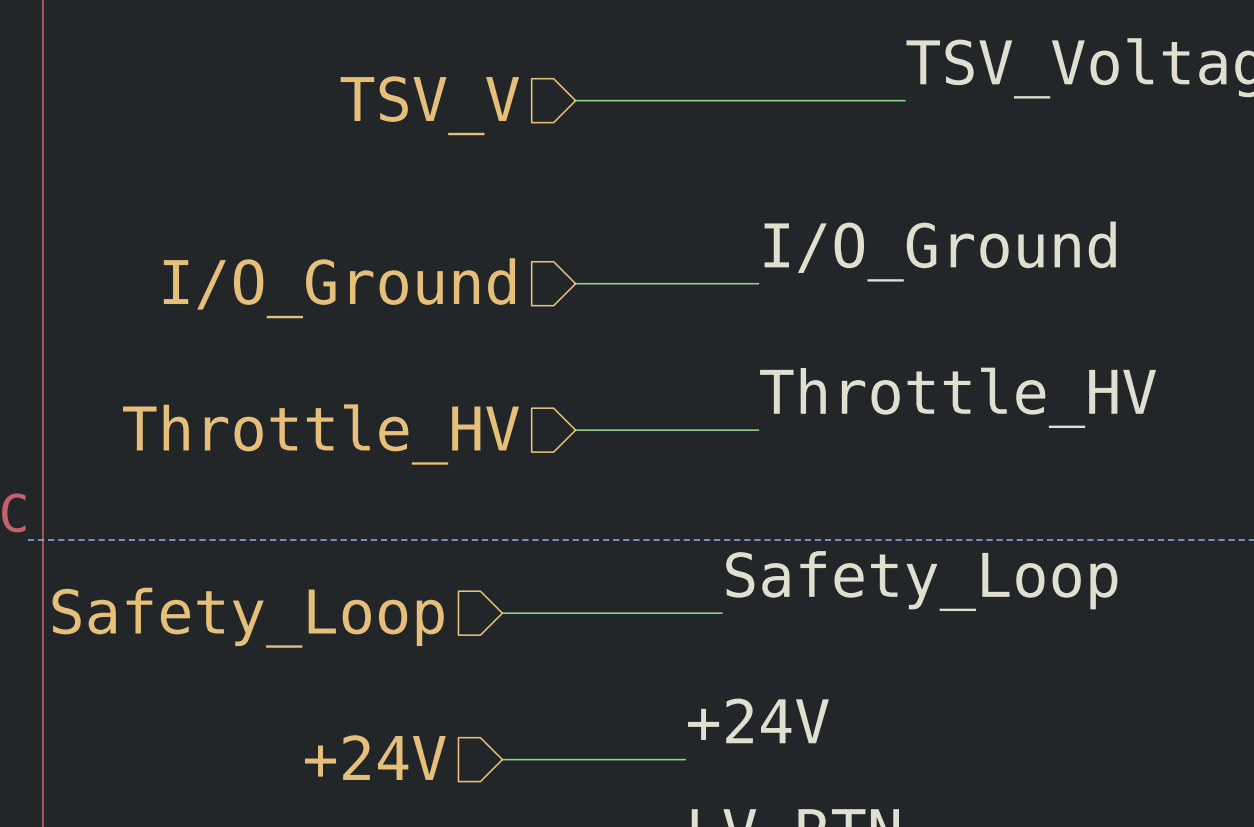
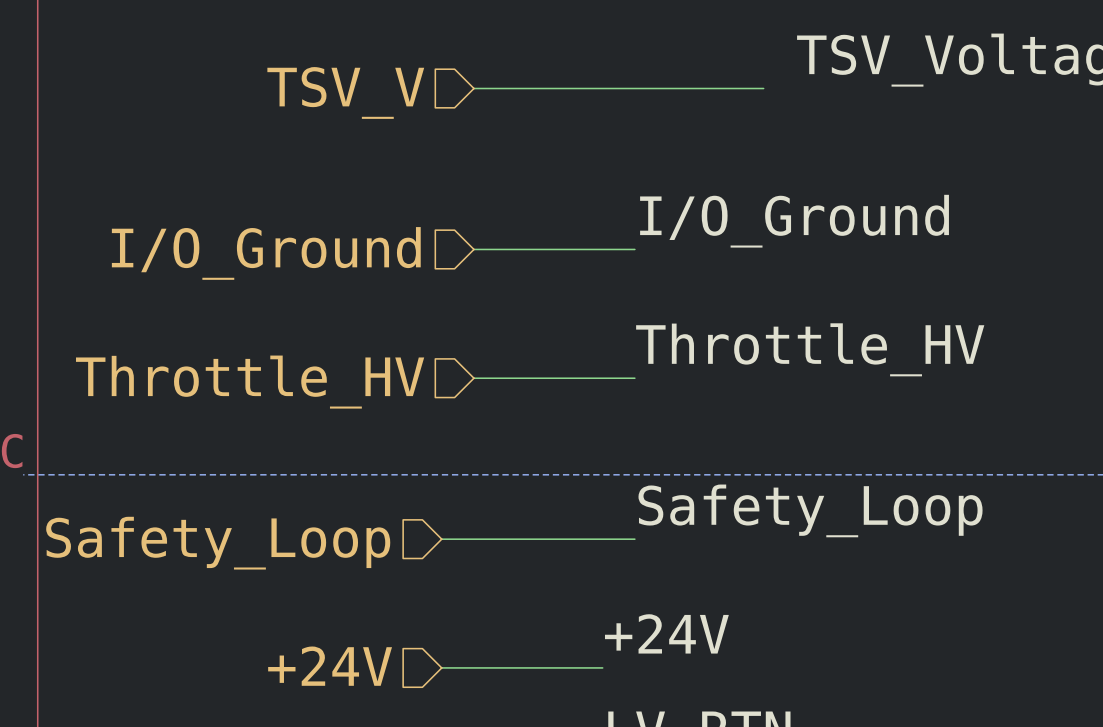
wire: (868, 100) (905, 100) -> (473, 88) (506, 88)
hierarchical label position: TSV_V (429, 105) -> TSV_V (345, 92)
label position: I/O_Ground (940, 251) -> I/O_Ground (794, 221)
wire: (722, 283) (758, 283) -> (473, 249) (506, 249)
hierarchical label position: I/O_Ground (339, 288) -> I/O_Ground (266, 253)
label position: Throttle_HV (958, 397) -> Throttle_HV (810, 349)
wire: (722, 430) (758, 430) -> (473, 378) (506, 378)
hierarchical label position: Throttle_HV (321, 434) -> Throttle_HV (250, 382)

